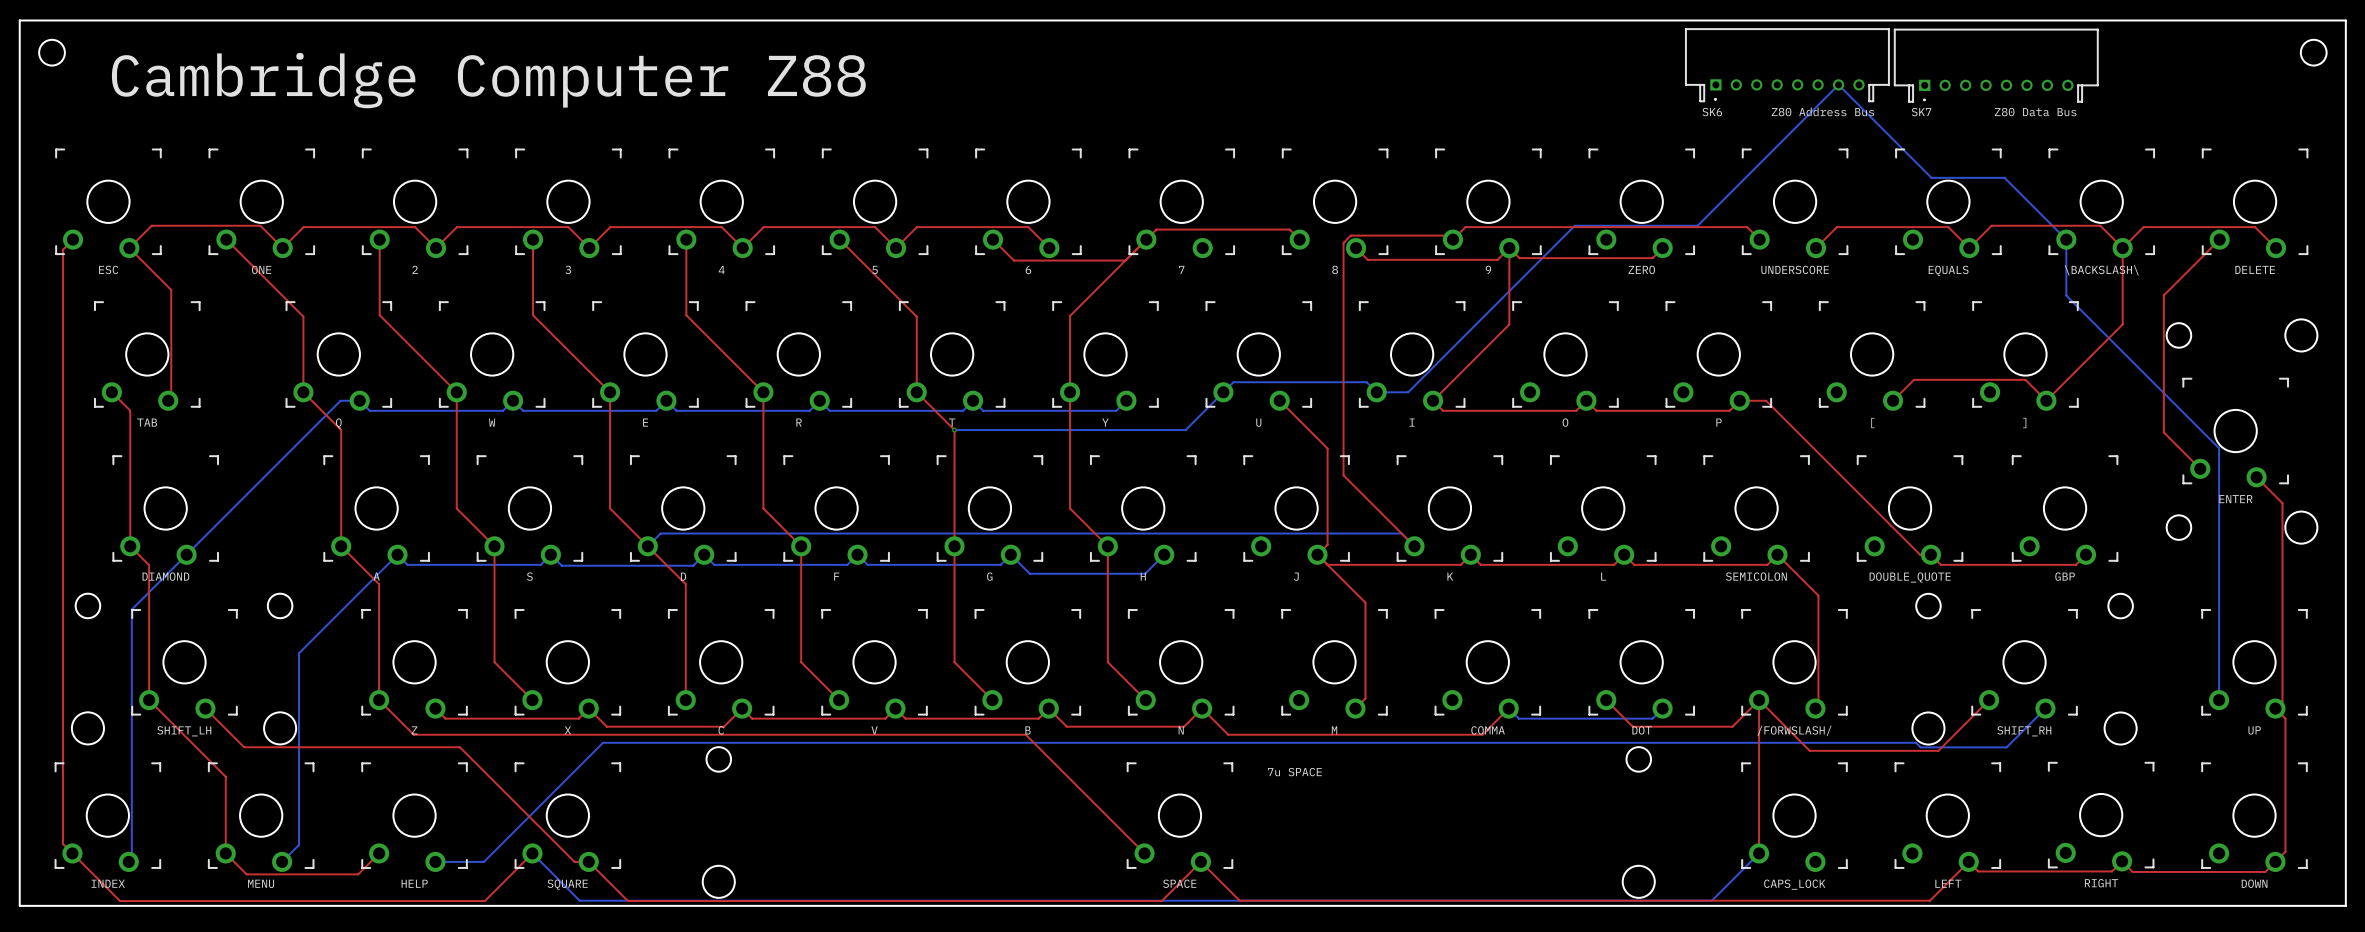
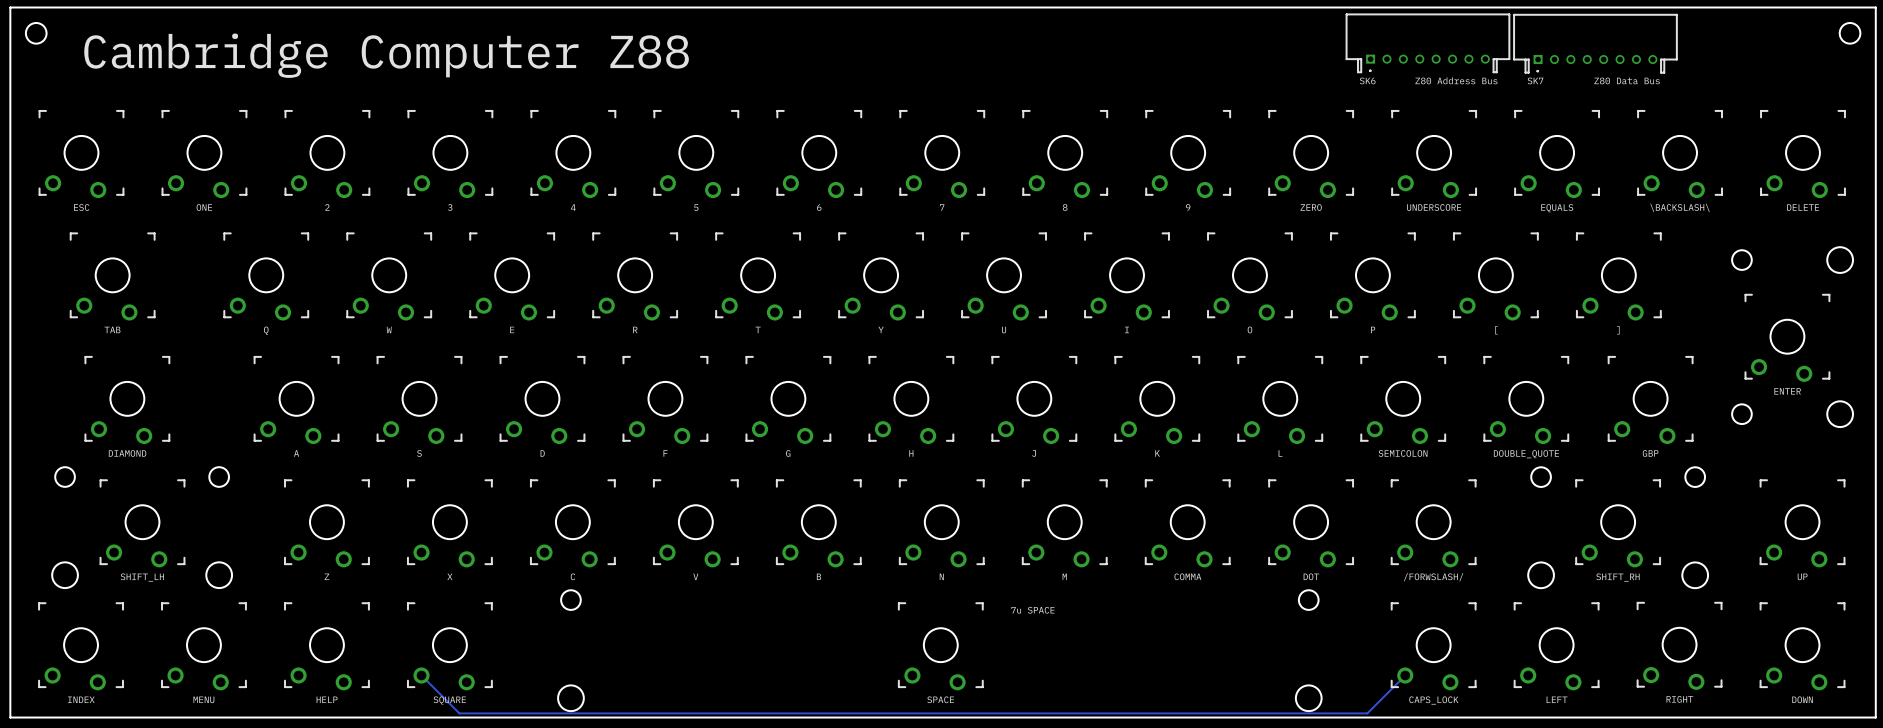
top track: (73, 239) (62, 249) (62, 843) (120, 901) (484, 901) (532, 853) -> none
top track: (226, 239) (303, 316) (303, 392) (341, 430) (341, 546) (379, 584) (379, 700) (413, 734) (1025, 734) (1144, 853) -> none
top track: (379, 239) (379, 315) (456, 392) (456, 508) (494, 546) (494, 662) (532, 700) -> none
top track: (533, 239) (533, 315) (610, 392) (610, 508) (685, 584) (685, 700) -> none
top track: (686, 239) (686, 315) (763, 392) (763, 508) (801, 546) (801, 662) (839, 700) -> none
top track: (839, 239) (916, 316) (916, 392) (954, 430) (954, 662) (992, 700) -> none
top track: (993, 239) (1013, 260) (1125, 260) -> none
top track: (1299, 239) (1289, 229) (1156, 229) (1070, 315) (1070, 508) (1107, 546) (1107, 662) (1145, 700) -> none
top track: (1759, 239) (1747, 227) (1465, 227) (1453, 239) (1448, 235) (1350, 235) (1343, 242) (1343, 475) (1414, 546) -> none
top track: (2219, 239) (2163, 295) (2163, 432) (2200, 468) -> none
top track: (1049, 248) (1028, 227) (916, 227) (896, 248) (875, 227) (763, 227) (742, 248) (721, 227) (610, 227) (589, 248) (568, 227) (456, 227) (436, 248) (415, 227) (303, 227) (282, 248) (260, 225) (151, 225) (129, 248) (171, 289) (171, 397) (168, 400) -> none
top track: (1356, 248) (1367, 259) (1497, 259) (1509, 248) -> none
top track: (1509, 248) (1519, 258) (1652, 258) (1662, 248) -> none
top track: (1509, 248) (1509, 324) (1433, 400) (1443, 410) (1576, 410) (1586, 400) (1596, 410) (1729, 410) (1739, 400) (1766, 400) (1920, 554) (1930, 554) (1941, 564) (2075, 564) (2085, 554) -> none
top track: (1816, 248) (1836, 227) (1948, 227) (1969, 248) (1991, 225) (2100, 225) (2122, 248) -> none
top track: (2122, 248) (2122, 324) (2046, 400) (2025, 379) (1914, 379) (1893, 400) -> none
top track: (2122, 248) (2143, 227) (2255, 227) (2275, 248) -> none
top track: (111, 392) (130, 410) (130, 546) (149, 565) (149, 700) (225, 776) (225, 853) (246, 874) (358, 874) (379, 853) -> none
bottom track: (1126, 400) (1116, 410) (983, 410) (973, 400) (963, 410) (829, 410) (819, 400) (809, 410) (676, 410) (666, 400) (656, 410) (523, 410) (513, 400) (503, 410) (369, 410) (359, 400) (340, 400) (131, 609) (131, 858) (128, 861) -> none
top track: (1279, 400) (1327, 448) (1327, 544) (1317, 554) (1365, 602) (1365, 698) (1355, 708) -> none
bottom track: (954, 430) (1185, 430) (1233, 382) (1366, 382) (1376, 392) (1408, 392) (1574, 225) (1697, 225) (1838, 84) (1931, 177) (2004, 177) (2066, 239) (2066, 295) (2219, 448) (2219, 700) -> none
via: (954, 430) -> none
top track: (2256, 477) (2282, 503) (2282, 701) (2275, 708) (2285, 718) (2285, 851) (2265, 871) (2132, 871) (2122, 861) (2112, 871) (1978, 871) (1968, 861) (1929, 900) (1239, 900) (1200, 861) (1161, 901) (627, 901) (588, 861) (574, 861) (459, 747) (244, 747) (205, 708) -> none
bottom track: (647, 546) (660, 533) (1401, 533) (1414, 546) -> none
bottom track: (1164, 554) (1145, 573) (1029, 573) (1010, 554) (1000, 564) (867, 564) (857, 554) (847, 564) (714, 564) (704, 554) (693, 565) (561, 565) (550, 554) (540, 564) (407, 564) (397, 554) (298, 653) (298, 845) (282, 861) -> none
top track: (1327, 564) (1460, 564) (1470, 554) (1480, 564) (1614, 564) (1624, 554) (1634, 564) (1767, 564) (1777, 554) (1818, 595) (1818, 705) (1815, 708) -> none
top track: (1606, 700) (1632, 726) (1732, 726) (1759, 700) -> none
top track: (1759, 700) (1759, 853) -> none
top track: (1759, 700) (1809, 750) (1938, 750) (1989, 700) -> none
top track: (435, 708) (445, 718) (578, 718) (588, 708) (606, 726) (724, 726) (742, 708) (752, 718) (885, 718) (895, 708) (905, 718) (1038, 718) (1048, 708) (1066, 726) (1184, 726) (1202, 708) (1228, 734) (1482, 734) (1508, 708) -> none
bottom track: (1508, 708) (1518, 718) (1652, 718) (1662, 708) -> none
bottom track: (2045, 708) (2006, 747) (1920, 747) (1916, 742) (603, 742) (483, 861) (435, 861) -> none

